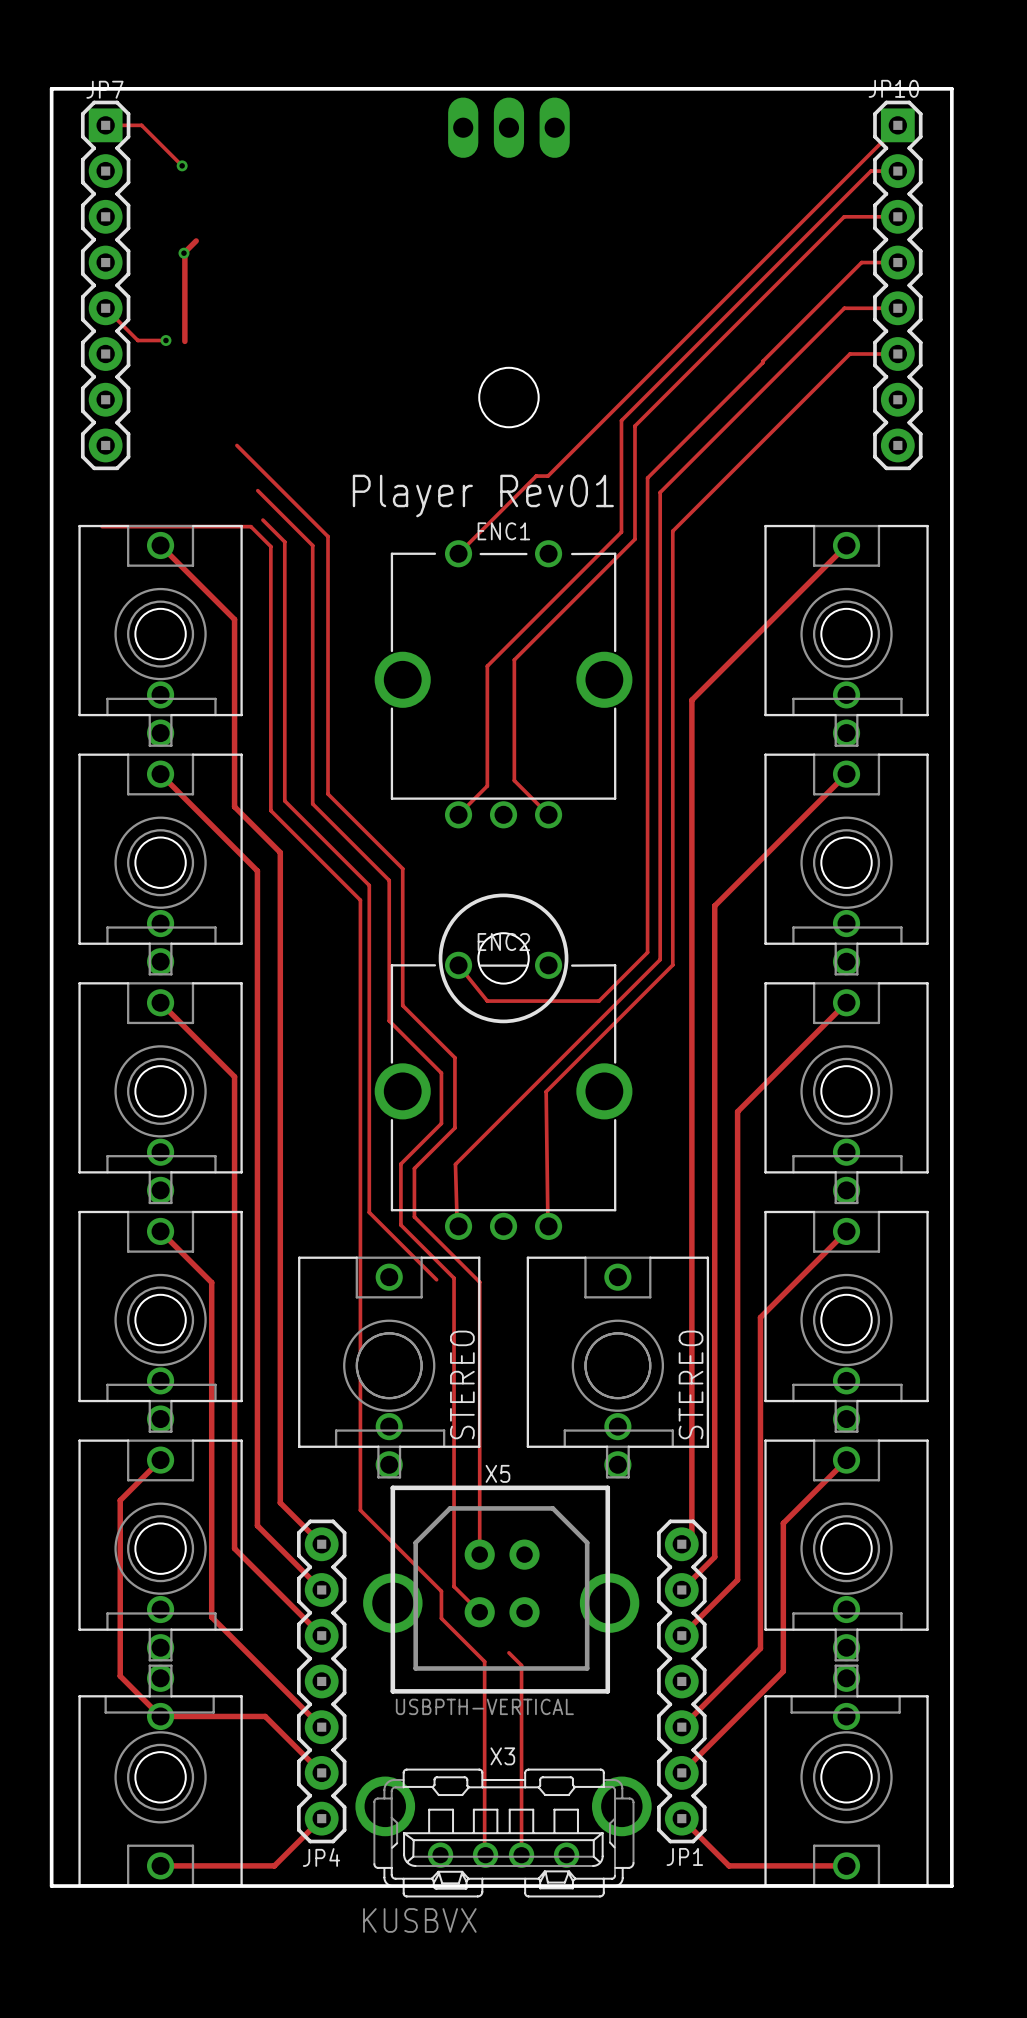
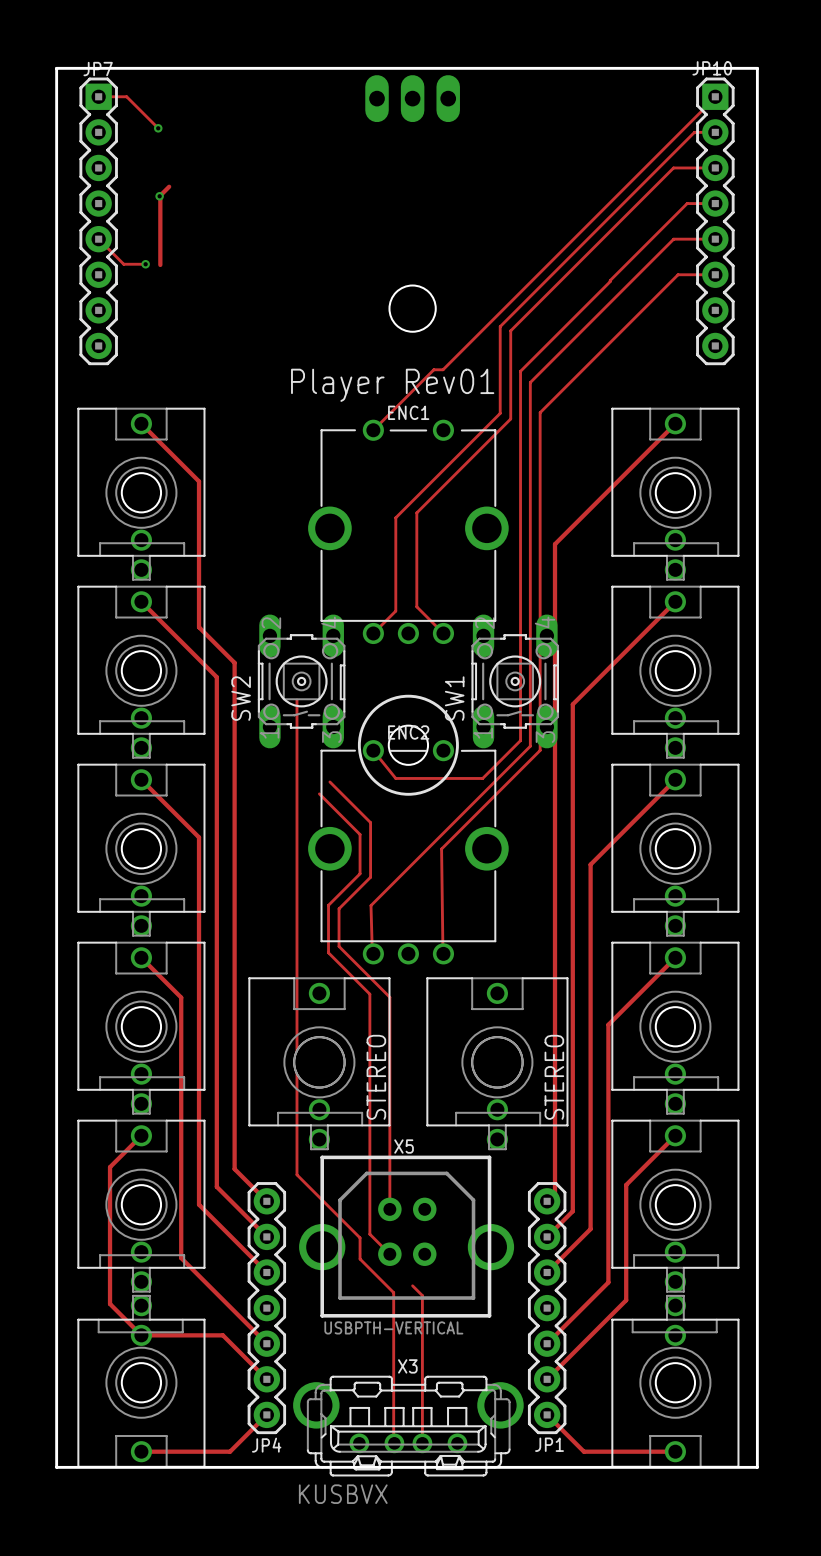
track: (236, 445) (328, 536) (328, 794) (402, 868) (402, 1005) -> none
track: (257, 490) (312, 545) (312, 803) (389, 880) (389, 1020) -> none
track: (262, 520) (284, 541) (284, 800) (369, 885) (369, 1212) (436, 1279) -> none
track: (102, 526) (250, 526) (270, 546) (270, 810) (360, 900) -> none
SW2: none -> (301, 681)
SW1: none -> (515, 681)

